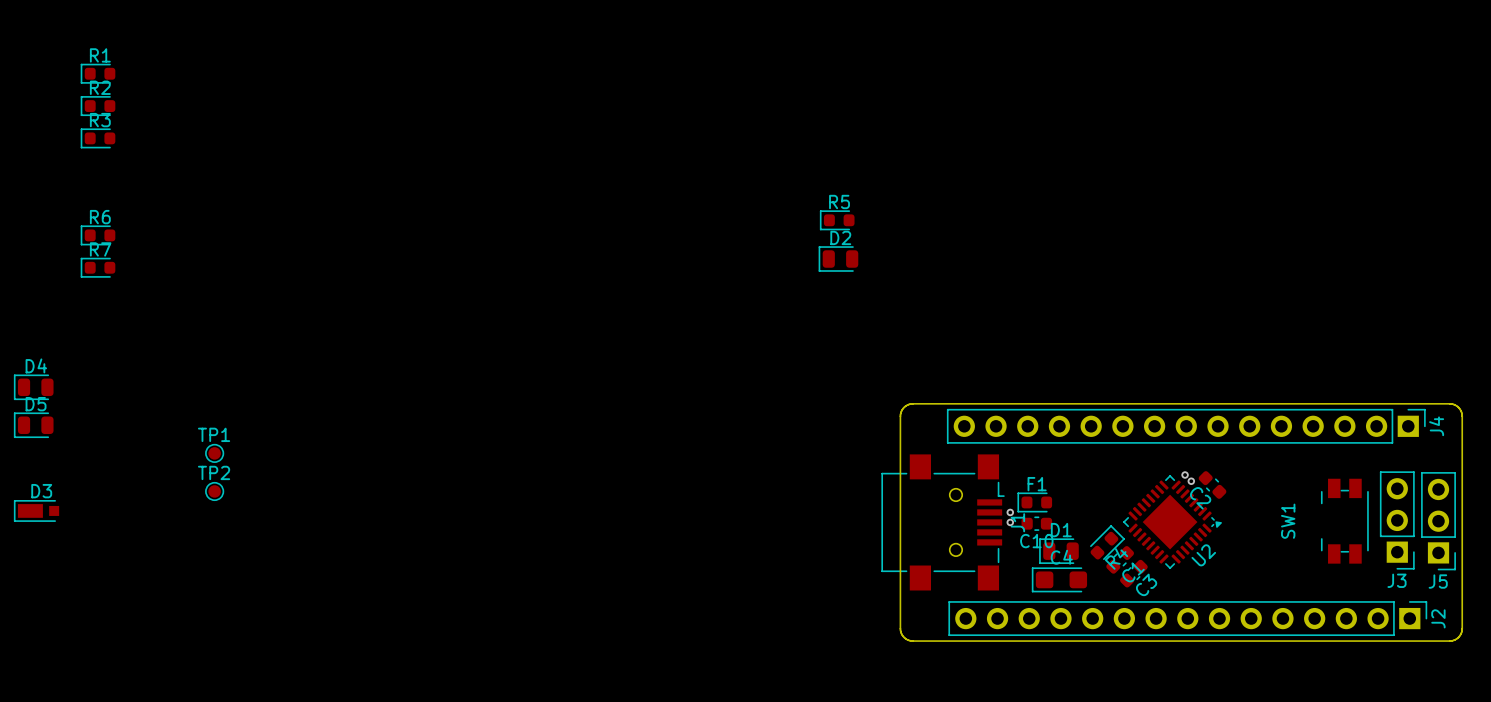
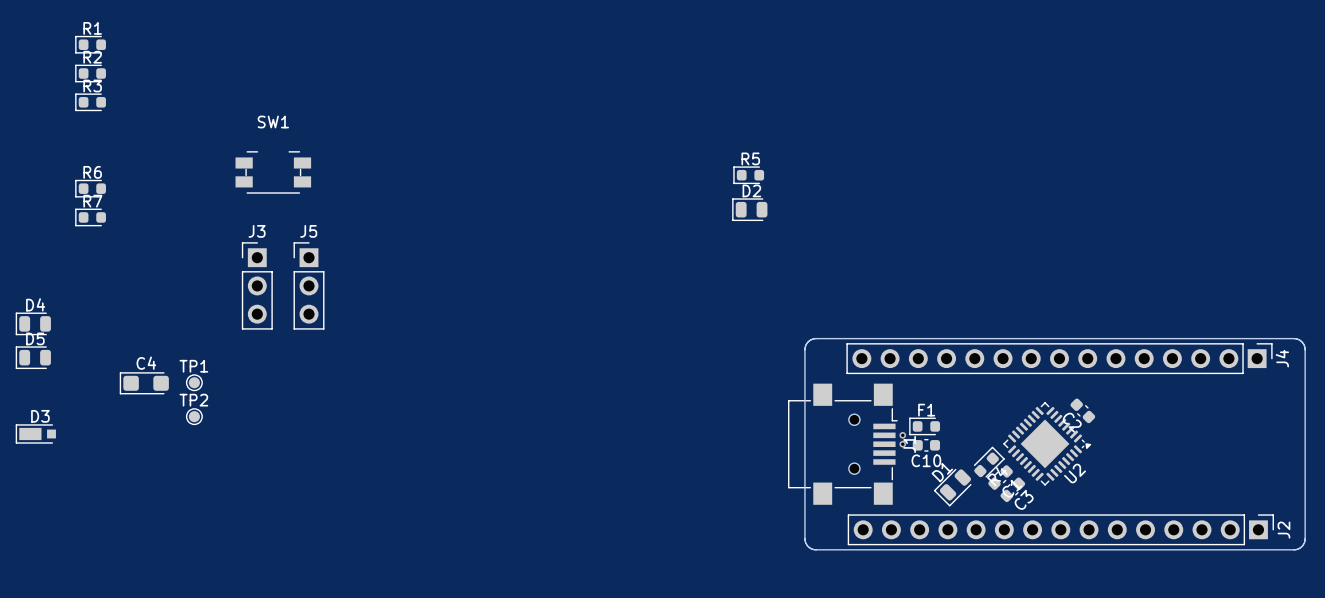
via: (1185, 475) -> none
via: (1191, 481) -> none
J3 rotation: 0° (1397, 520) -> 180° (257, 285)
J3 position: (1397, 520) -> (257, 285)
SW1 rotation: 0° (1344, 521) -> 90° clockwise (273, 172)
SW1 position: (1344, 521) -> (273, 172)
J5 rotation: 0° (1438, 521) -> 180° (309, 285)
J5 position: (1438, 521) -> (309, 285)
D1 rotation: 0° (1059, 551) -> 45° counterclockwise (952, 487)
C4 position: (1059, 579) -> (144, 383)

